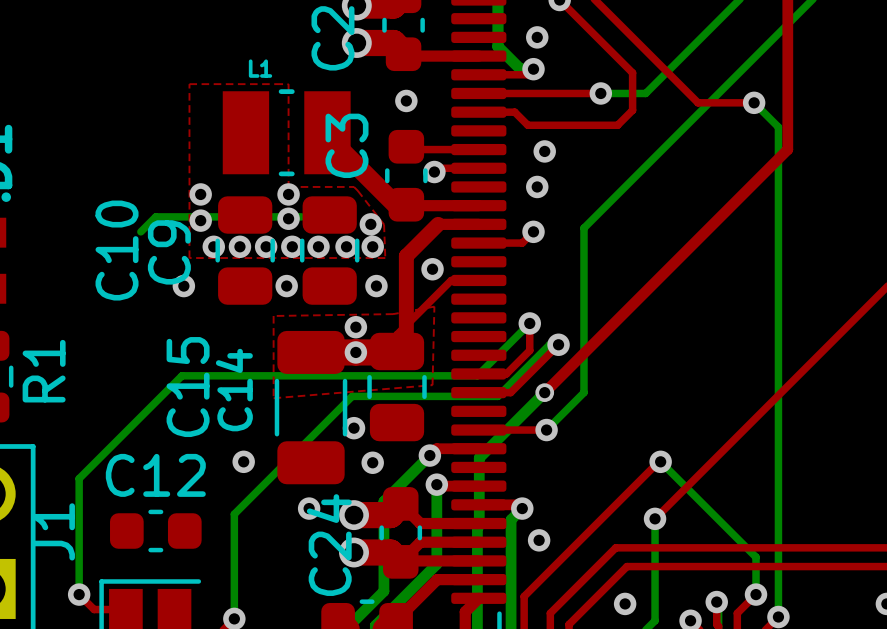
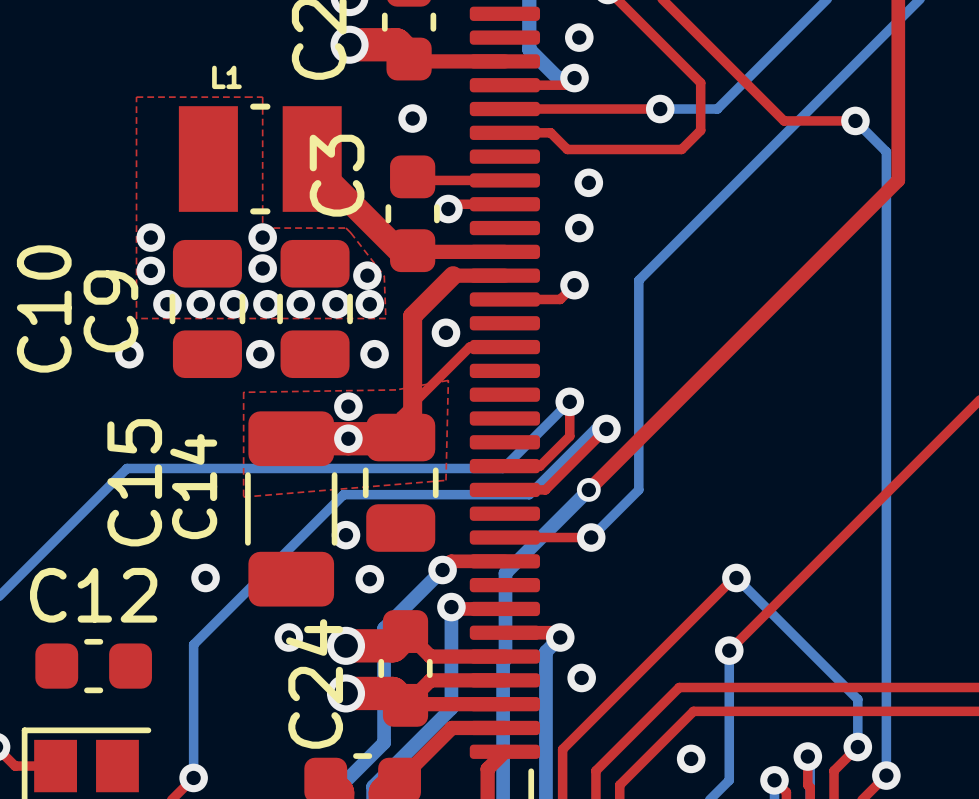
bottom track: (301, 216) (155, 216) (140, 231) -> none

